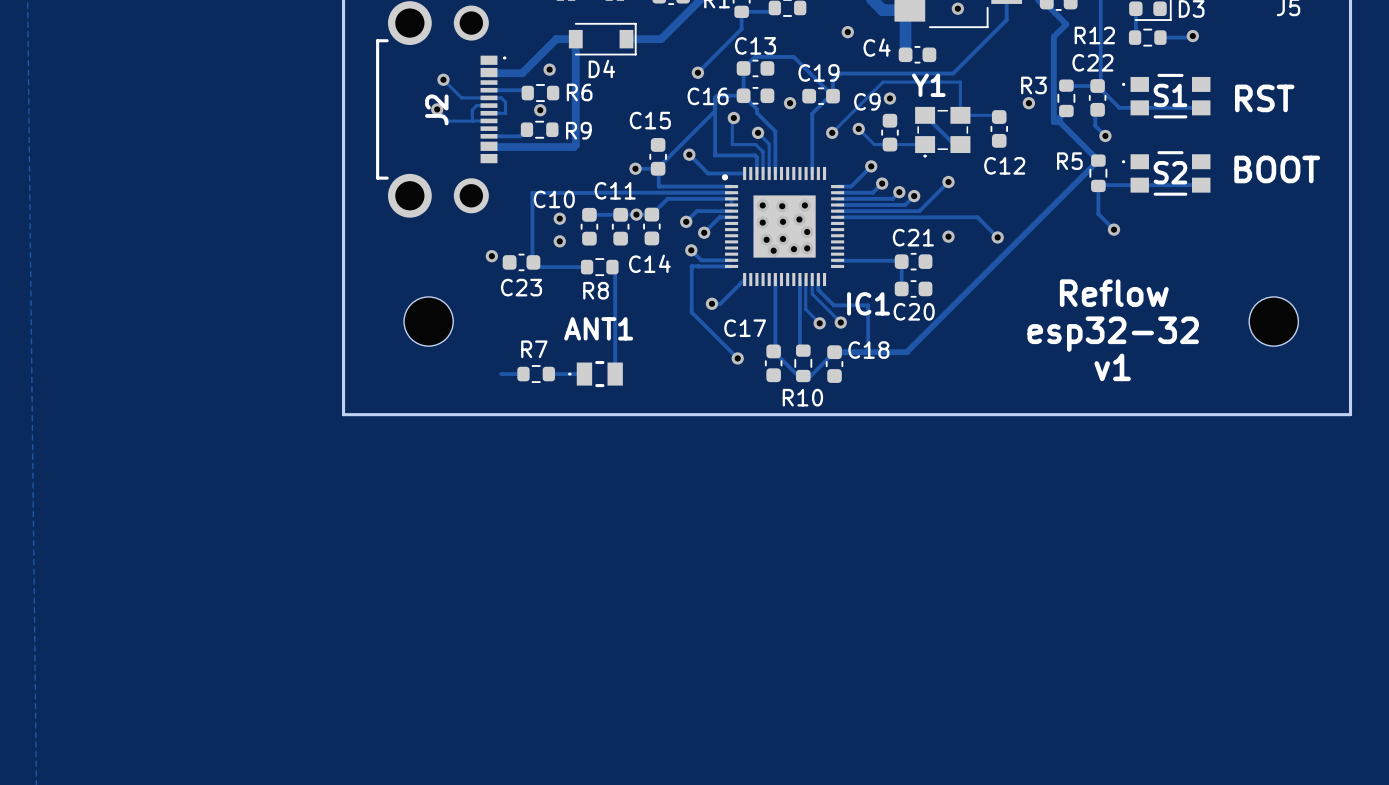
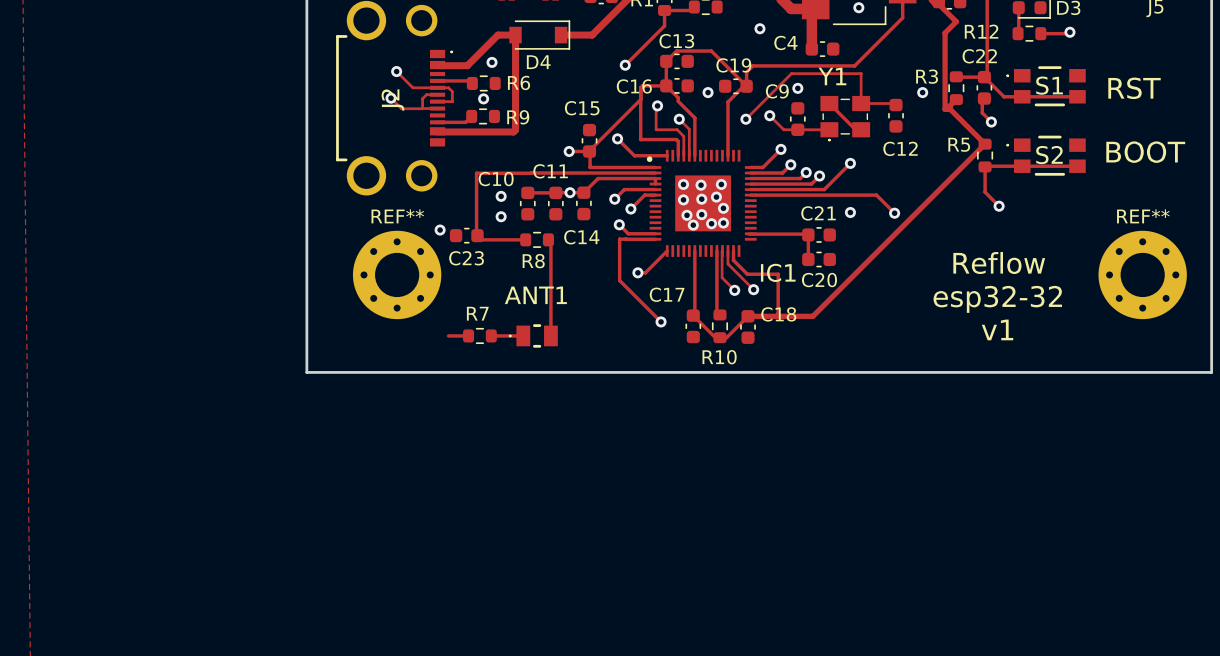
REF**: none -> (397, 274)
REF**: none -> (1142, 274)
part: (428, 321) -> none
part: (1273, 321) -> none

